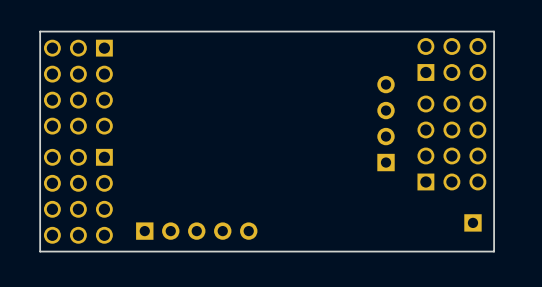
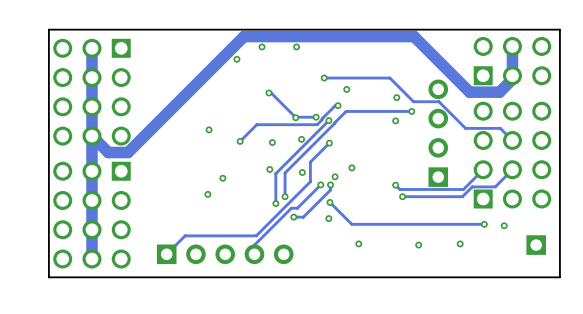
via: none -> (262, 46)
via: none -> (296, 46)
track: none -> (512, 46) (512, 79) (499, 92) (469, 92) (414, 36) (243, 36) (128, 152) (108, 152) (91, 136)
track: none -> (91, 48) (91, 259)
via: none -> (236, 59)
track: none -> (324, 78) (389, 78) (413, 101) (438, 101) (465, 128) (500, 128) (512, 140)
via: none -> (324, 78)
via: none -> (346, 89)
track: none -> (268, 93) (271, 93) (295, 117) (316, 117)
via: none -> (268, 93)
via: none -> (396, 97)
track: none -> (338, 105) (335, 105) (317, 124) (256, 124) (240, 141)
via: none -> (338, 105)
track: none -> (411, 111) (346, 111) (285, 172) (285, 196)
via: none -> (411, 111)
via: none -> (295, 117)
via: none -> (316, 117)
track: none -> (328, 120) (275, 173) (275, 203)
via: none -> (328, 120)
via: none -> (395, 120)
via: none -> (209, 129)
via: none -> (301, 139)
via: none -> (240, 141)
via: none -> (272, 142)
track: none -> (329, 143) (310, 162) (310, 181) (256, 235) (185, 235) (166, 254)
via: none -> (329, 143)
via: none -> (351, 167)
via: none -> (269, 169)
track: none -> (483, 169) (463, 189) (399, 189) (395, 185)
track: none -> (512, 169) (495, 186) (472, 186) (462, 196) (402, 196)
via: none -> (302, 172)
via: none -> (335, 176)
via: none -> (222, 178)
track: none -> (320, 184) (297, 208) (291, 208) (254, 245) (254, 254)
via: none -> (320, 184)
track: none -> (330, 184) (330, 190) (303, 217) (293, 217)
via: none -> (330, 184)
via: none -> (395, 185)
via: none -> (207, 194)
via: none -> (285, 196)
via: none -> (402, 196)
track: none -> (329, 202) (351, 224) (484, 224)
via: none -> (329, 202)
via: none -> (275, 203)
via: none -> (293, 217)
via: none -> (328, 218)
via: none -> (484, 224)
via: none -> (504, 225)
via: none -> (358, 243)
via: none -> (460, 243)
via: none -> (418, 245)

